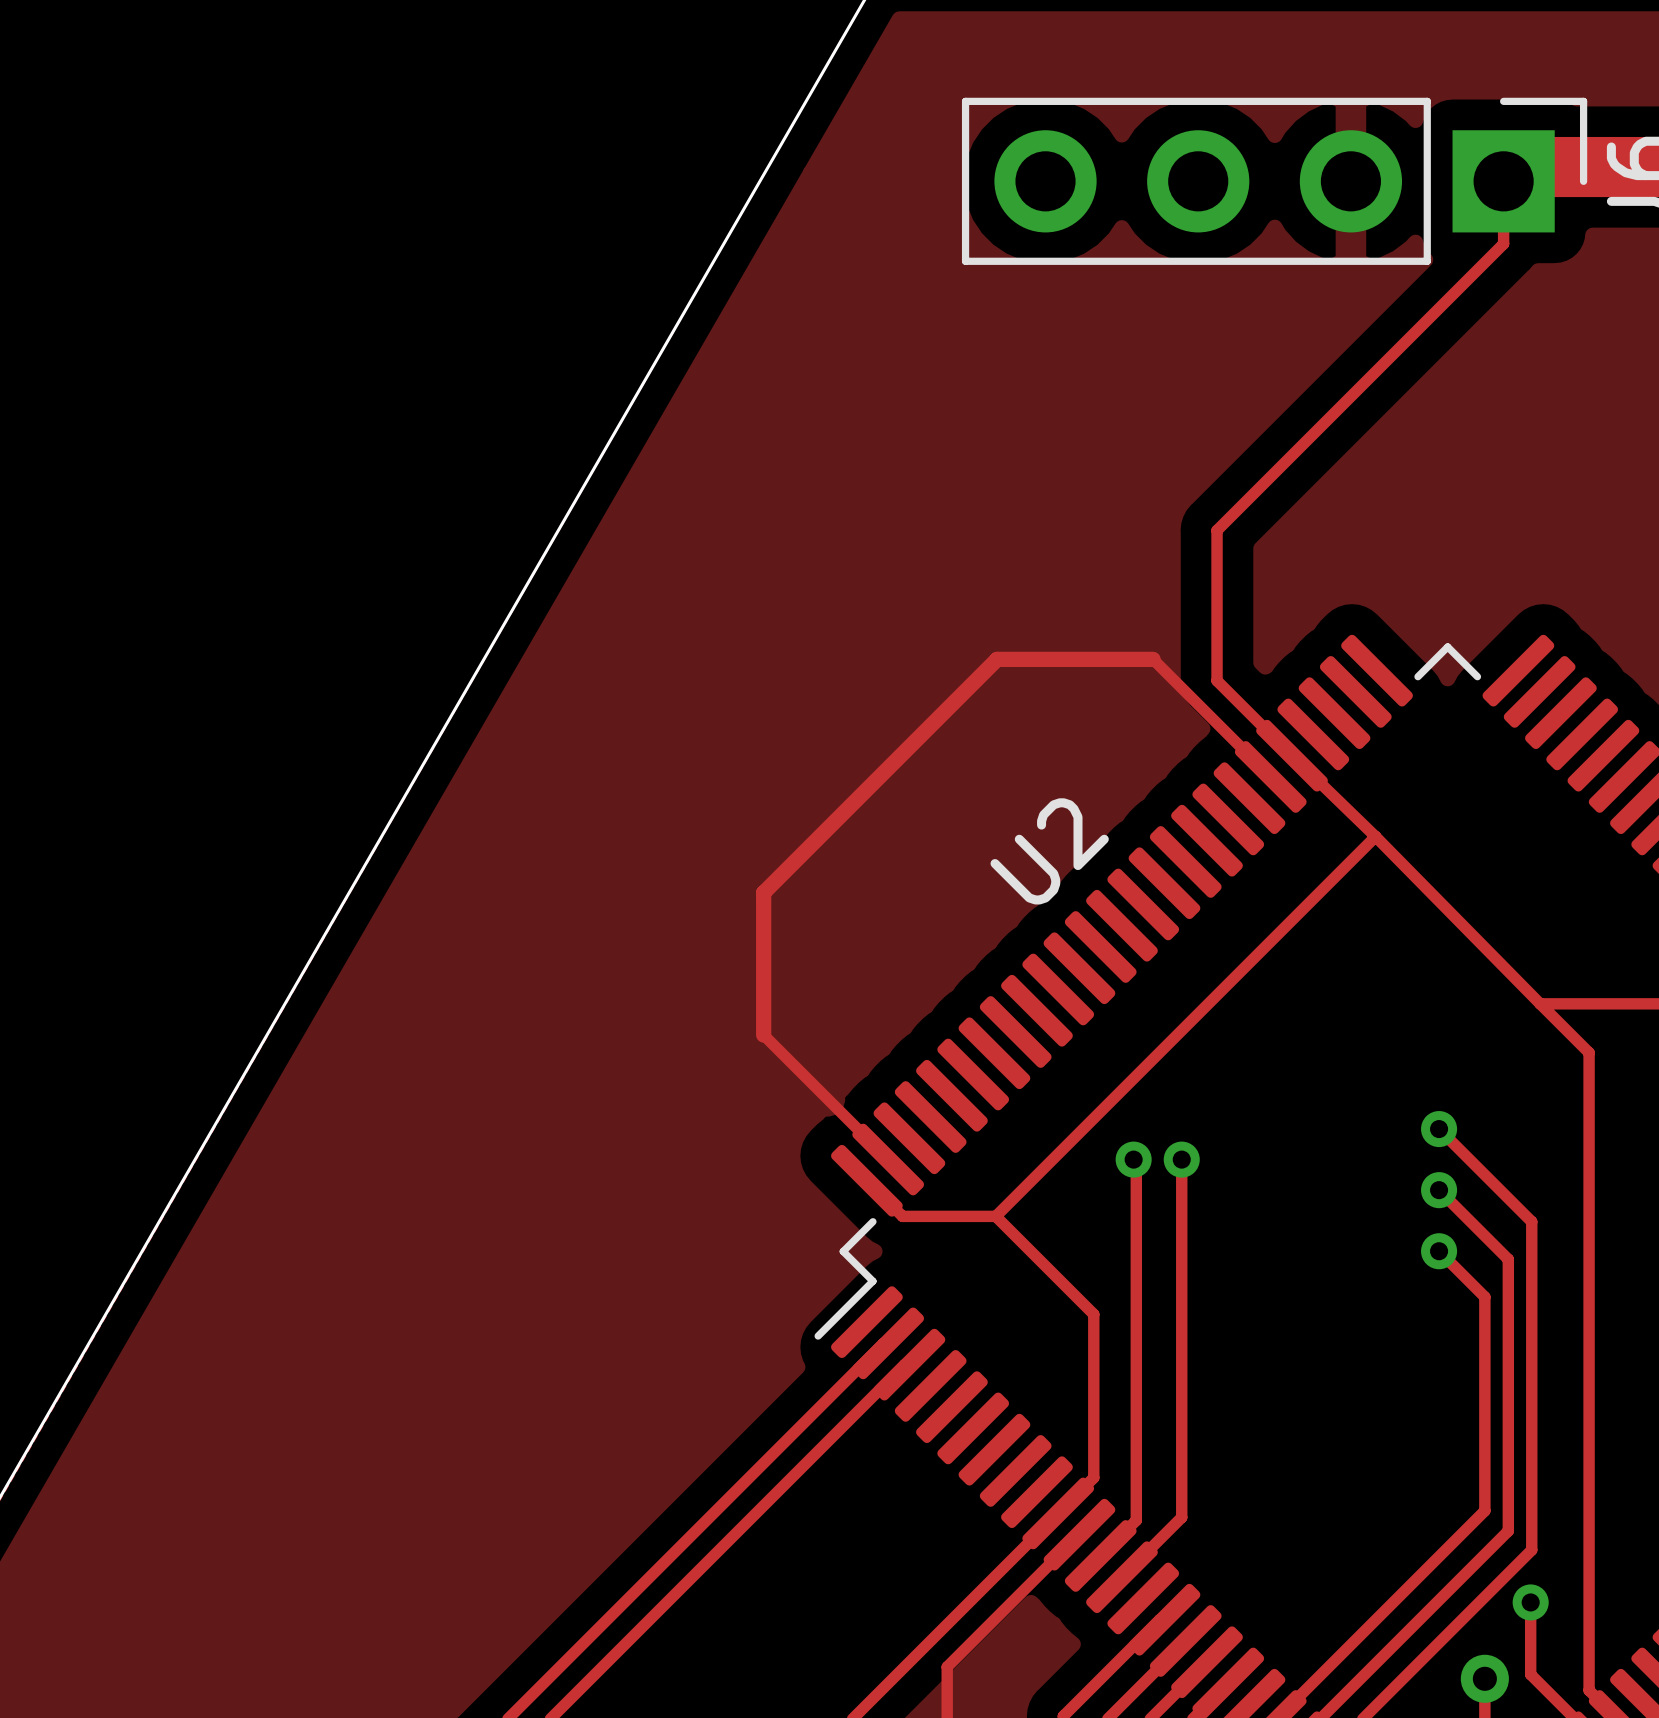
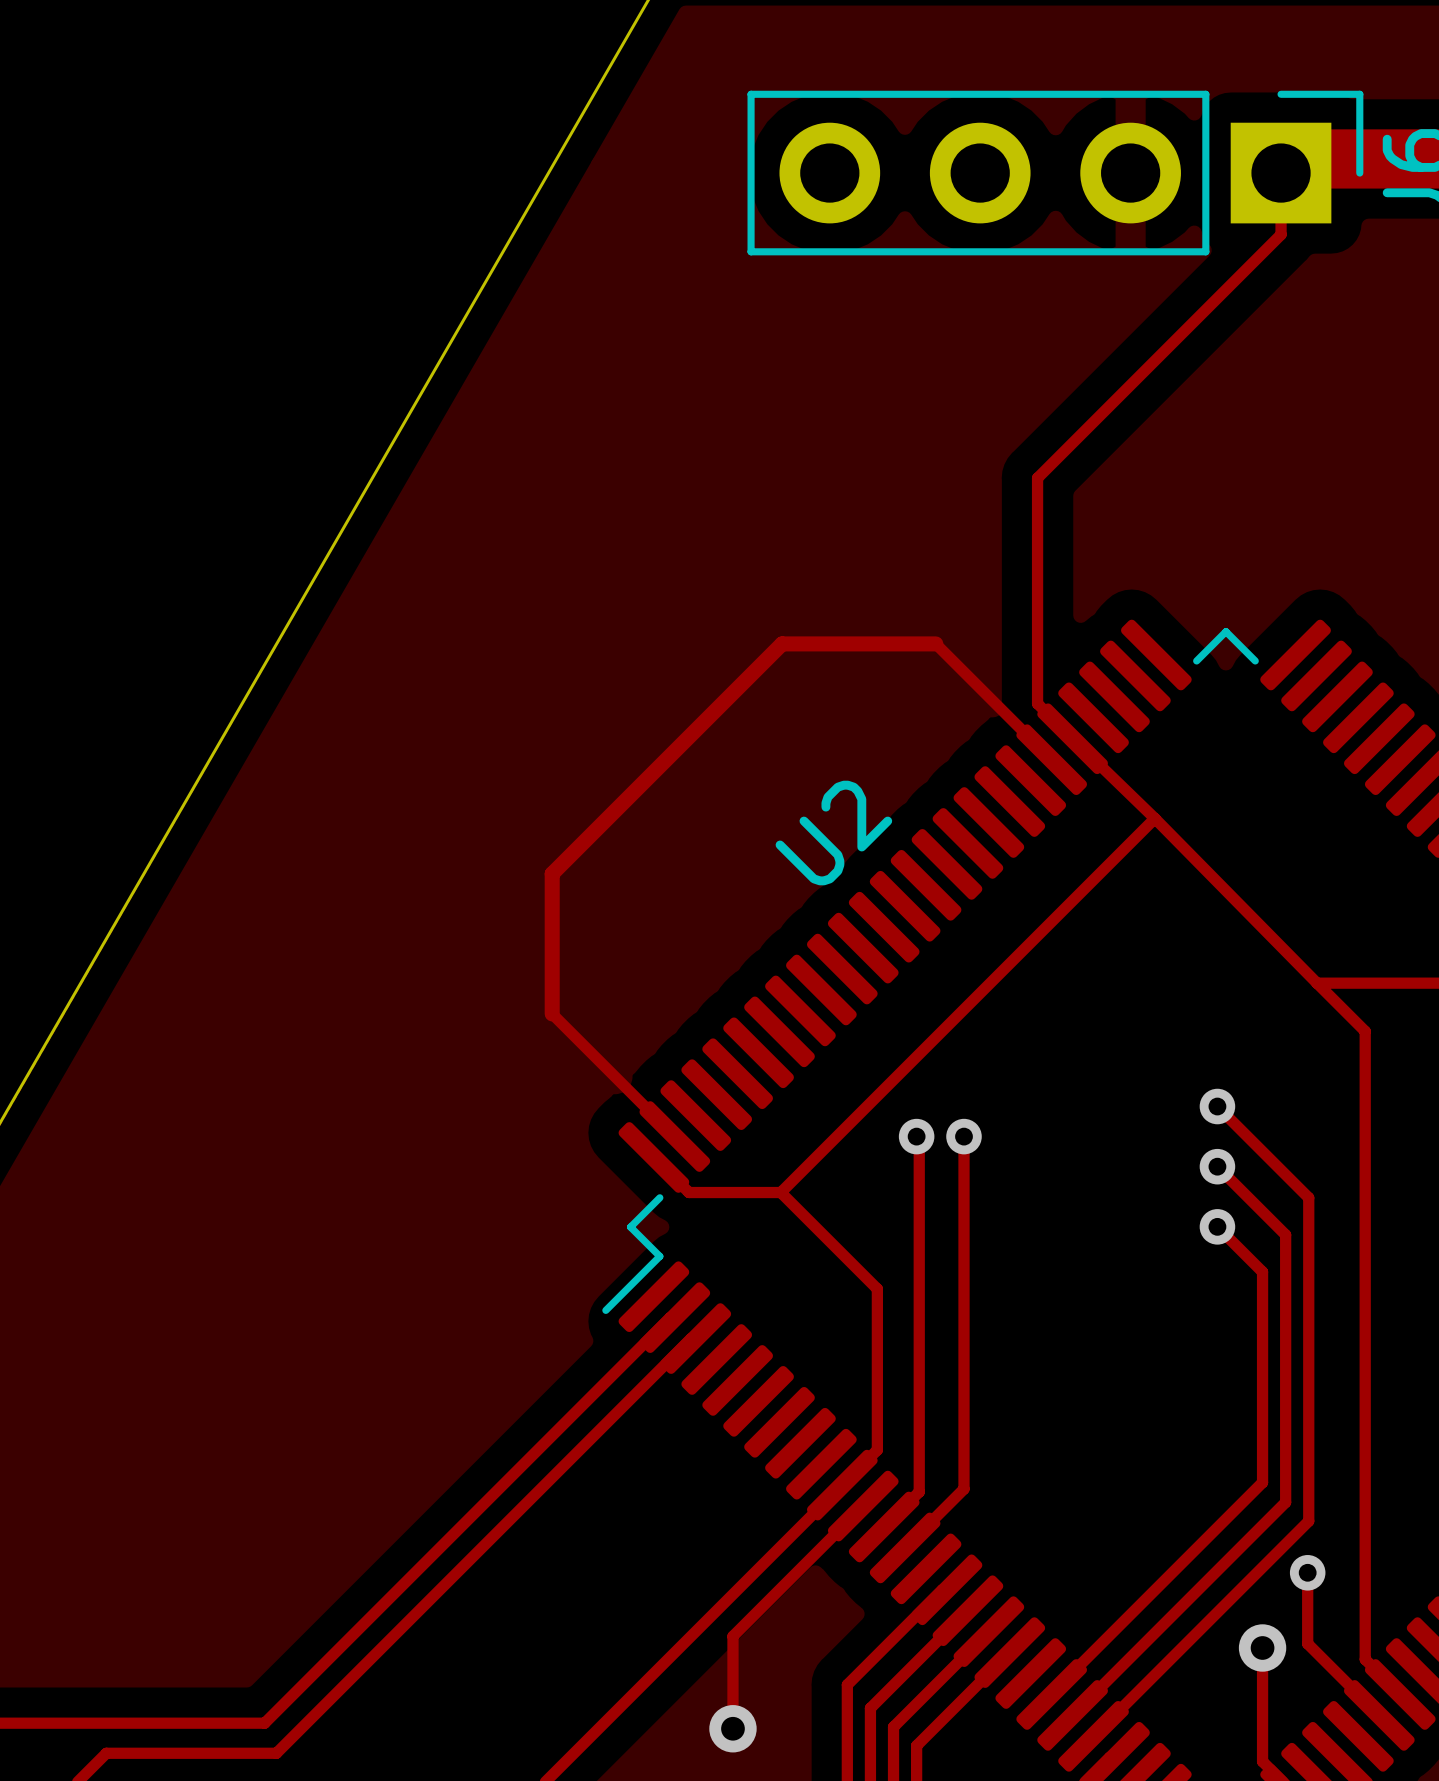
track: (1256, 491) (1217, 530) (1217, 680) (1256, 720) -> (1037, 478) (1037, 703)

